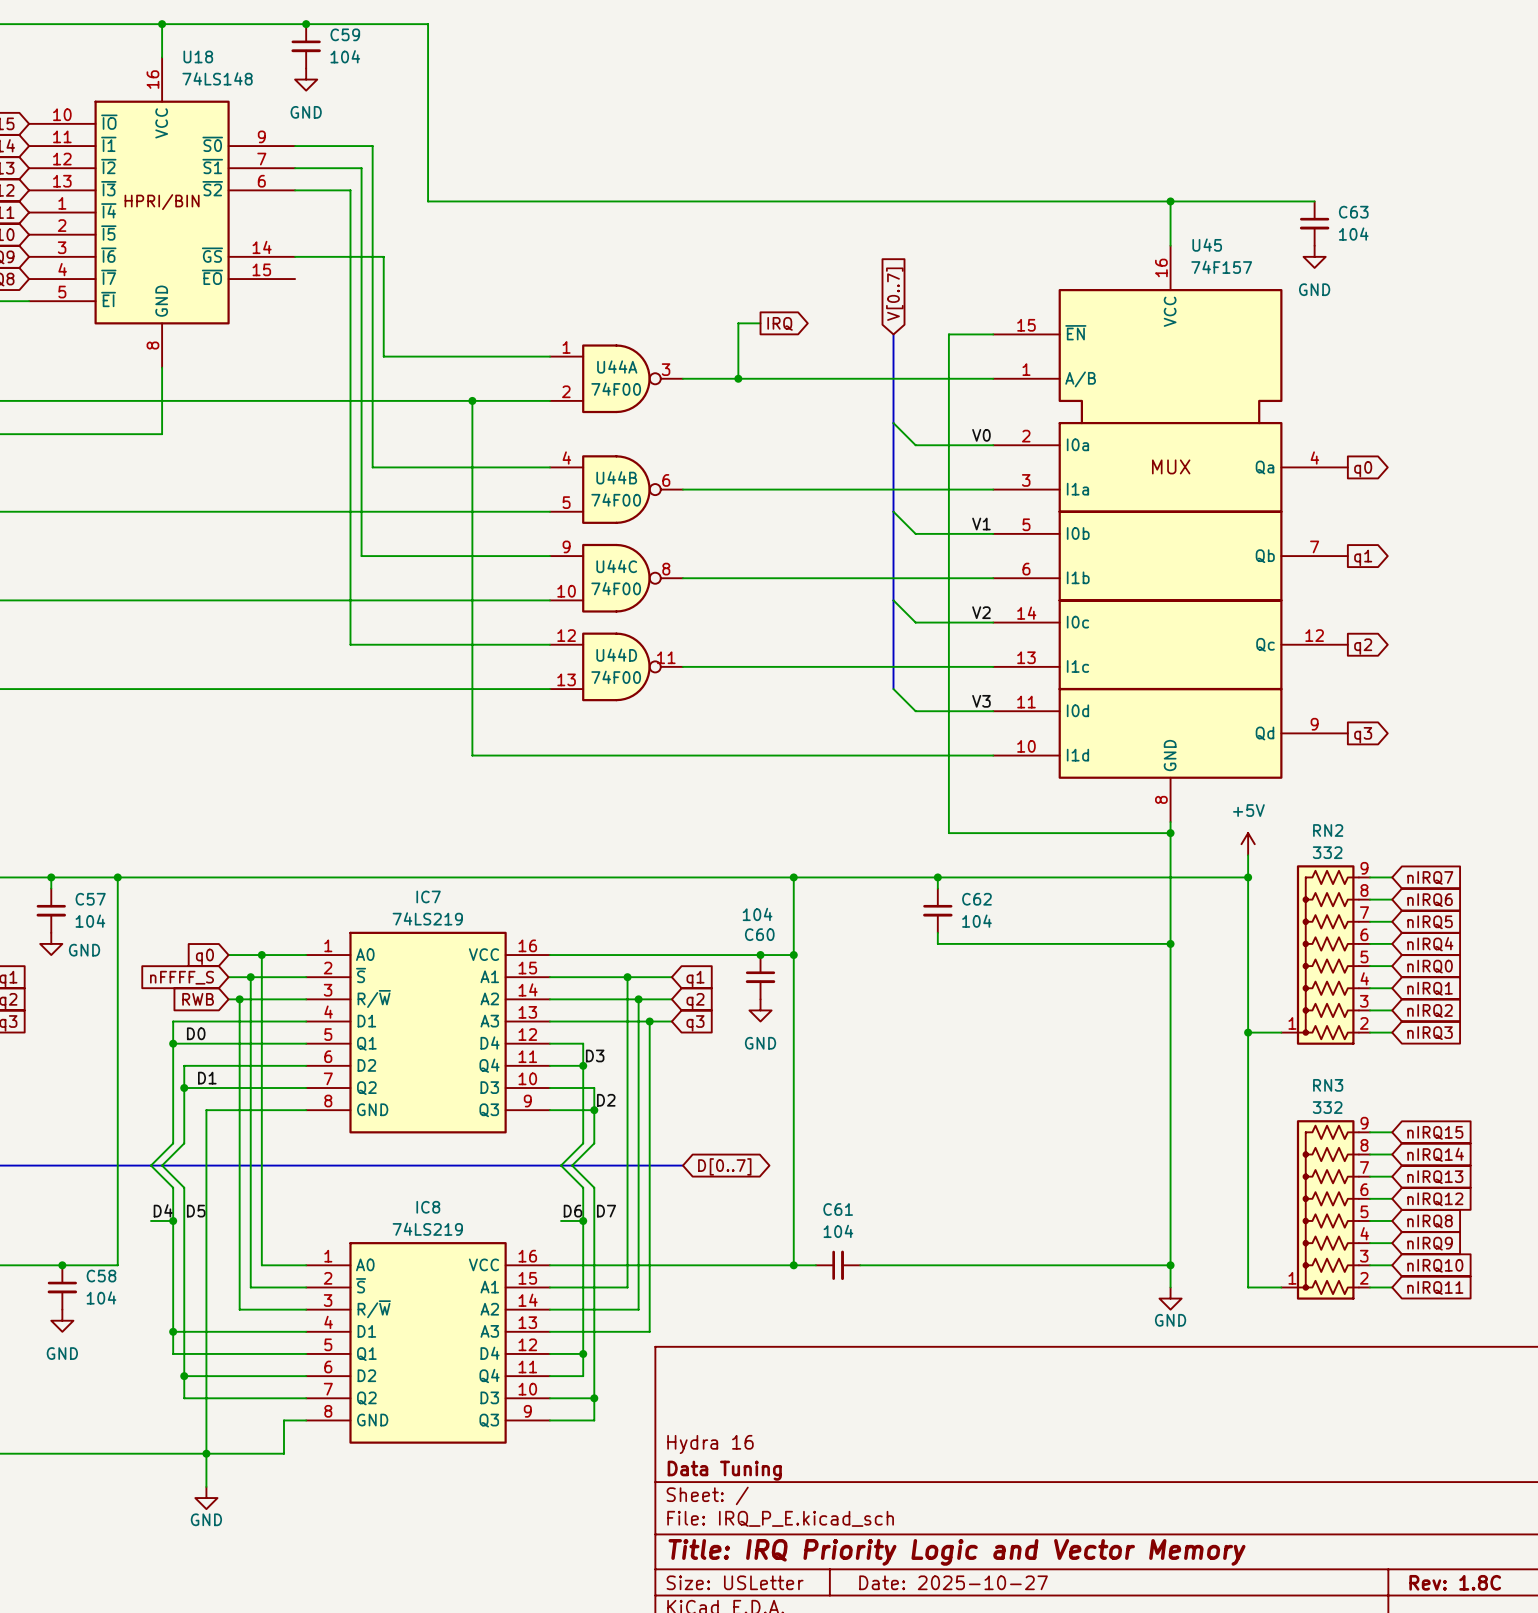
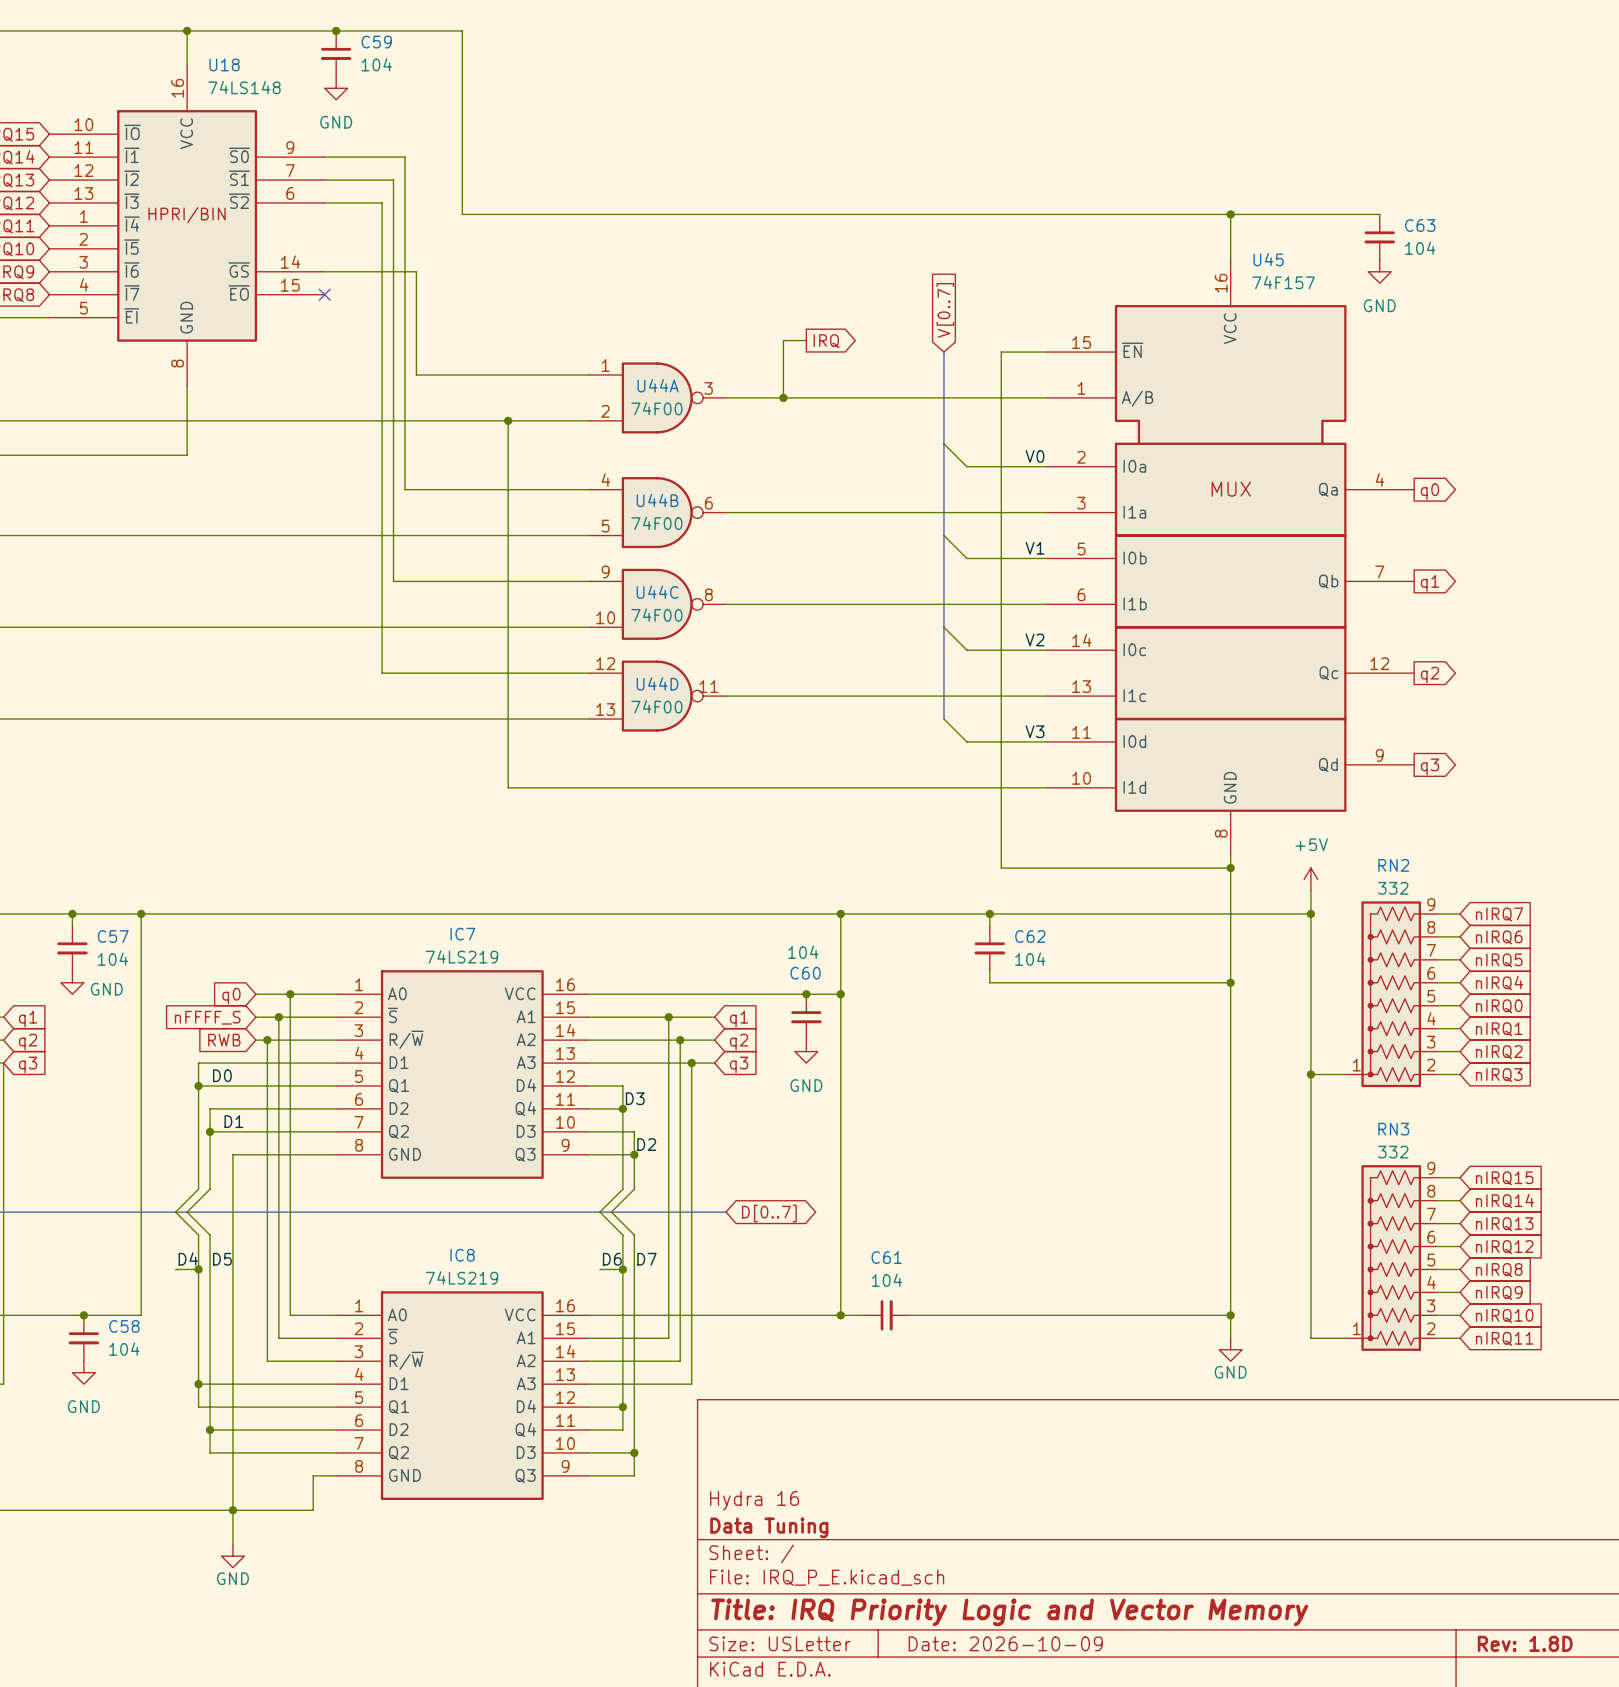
no-connect mark: none -> (324, 294)
title block: Date: 2025-10-27 (953, 1582) -> Date: 2026-10-09 (1005, 1643)
title block: Rev: 1.8C (1455, 1582) -> Rev: 1.8D (1525, 1643)

